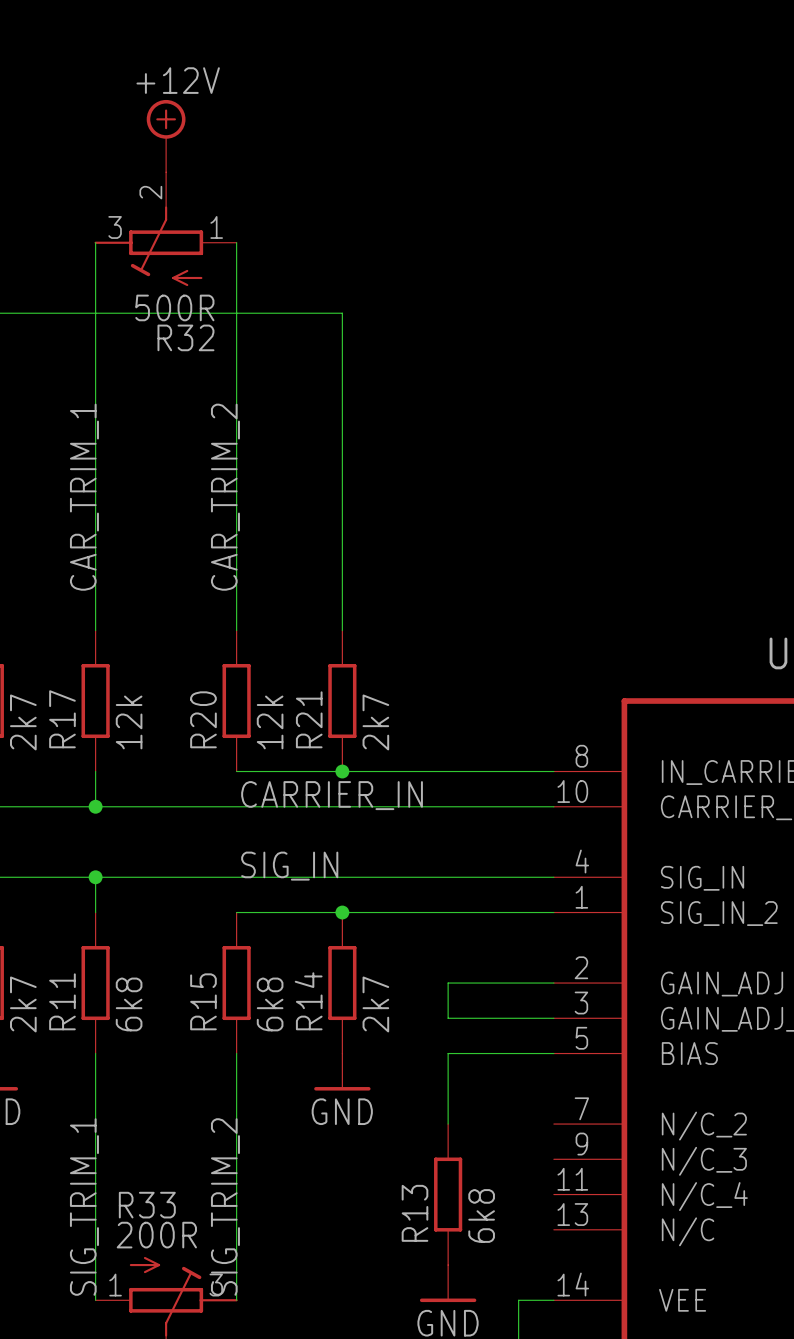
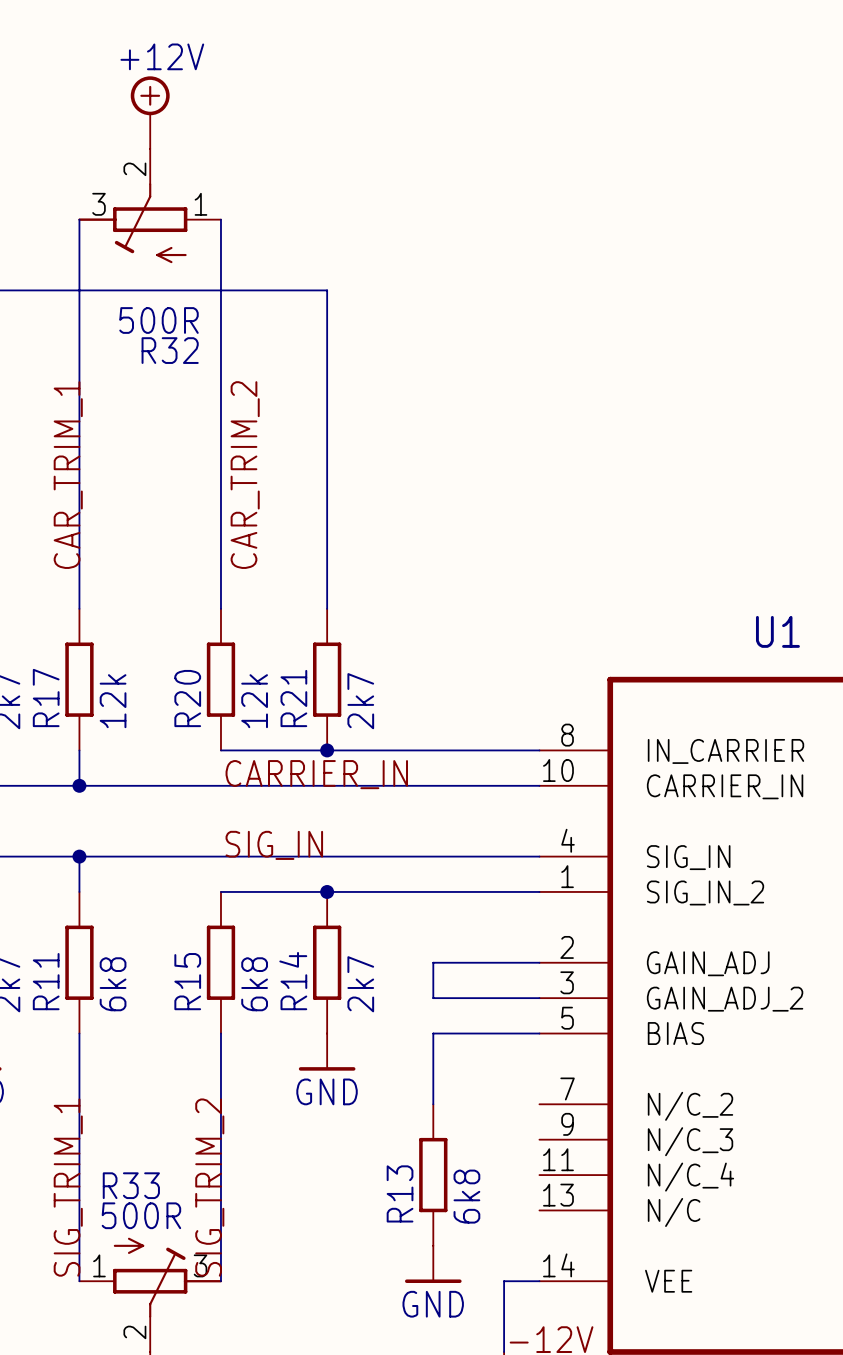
R32 value position: 500R (174, 307) -> 500R (158, 320)
R32 name position: R32 (185, 337) -> R32 (170, 350)
label position: CAR_TRIM_2 (225, 497) -> CAR_TRIM_2 (245, 475)
R33 value: 200R (156, 1235) -> 500R (141, 1215)

